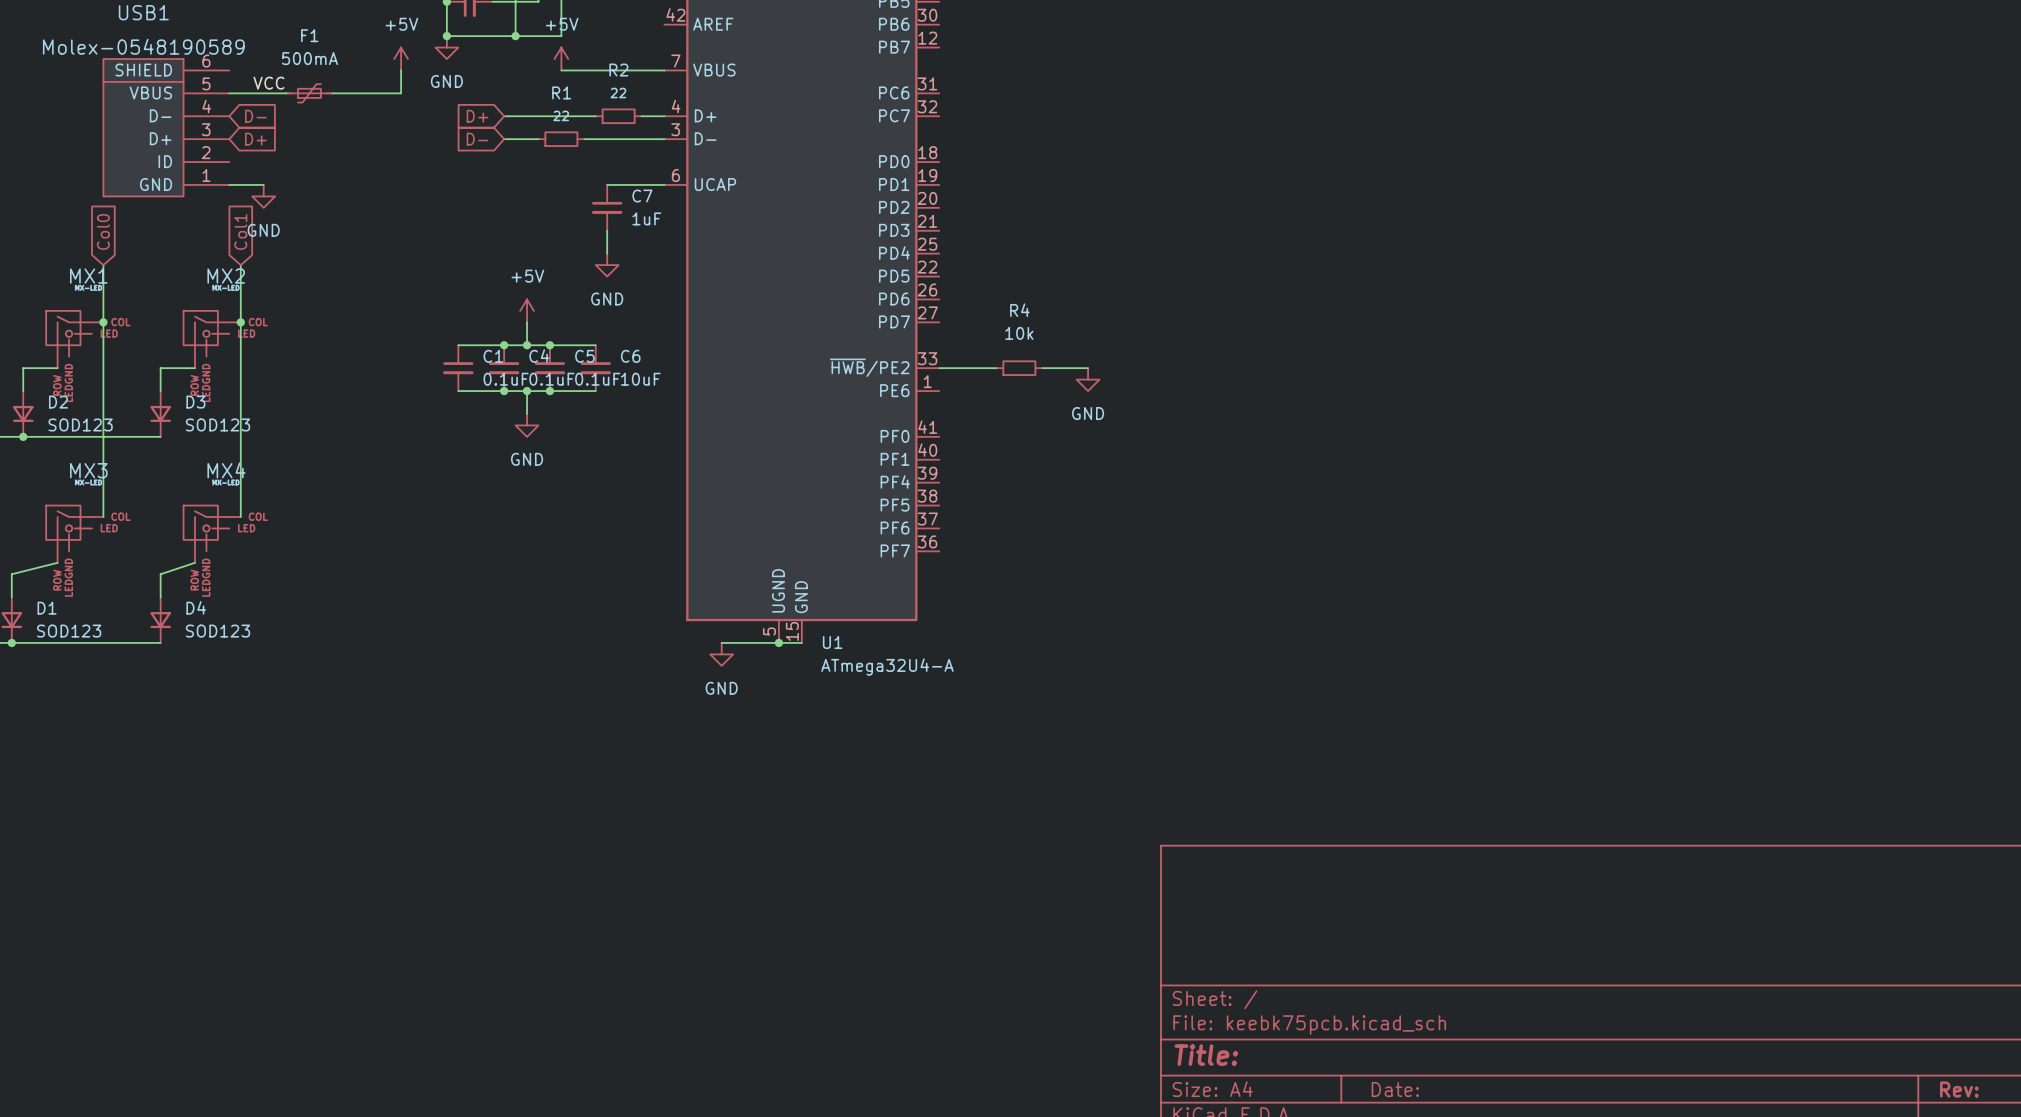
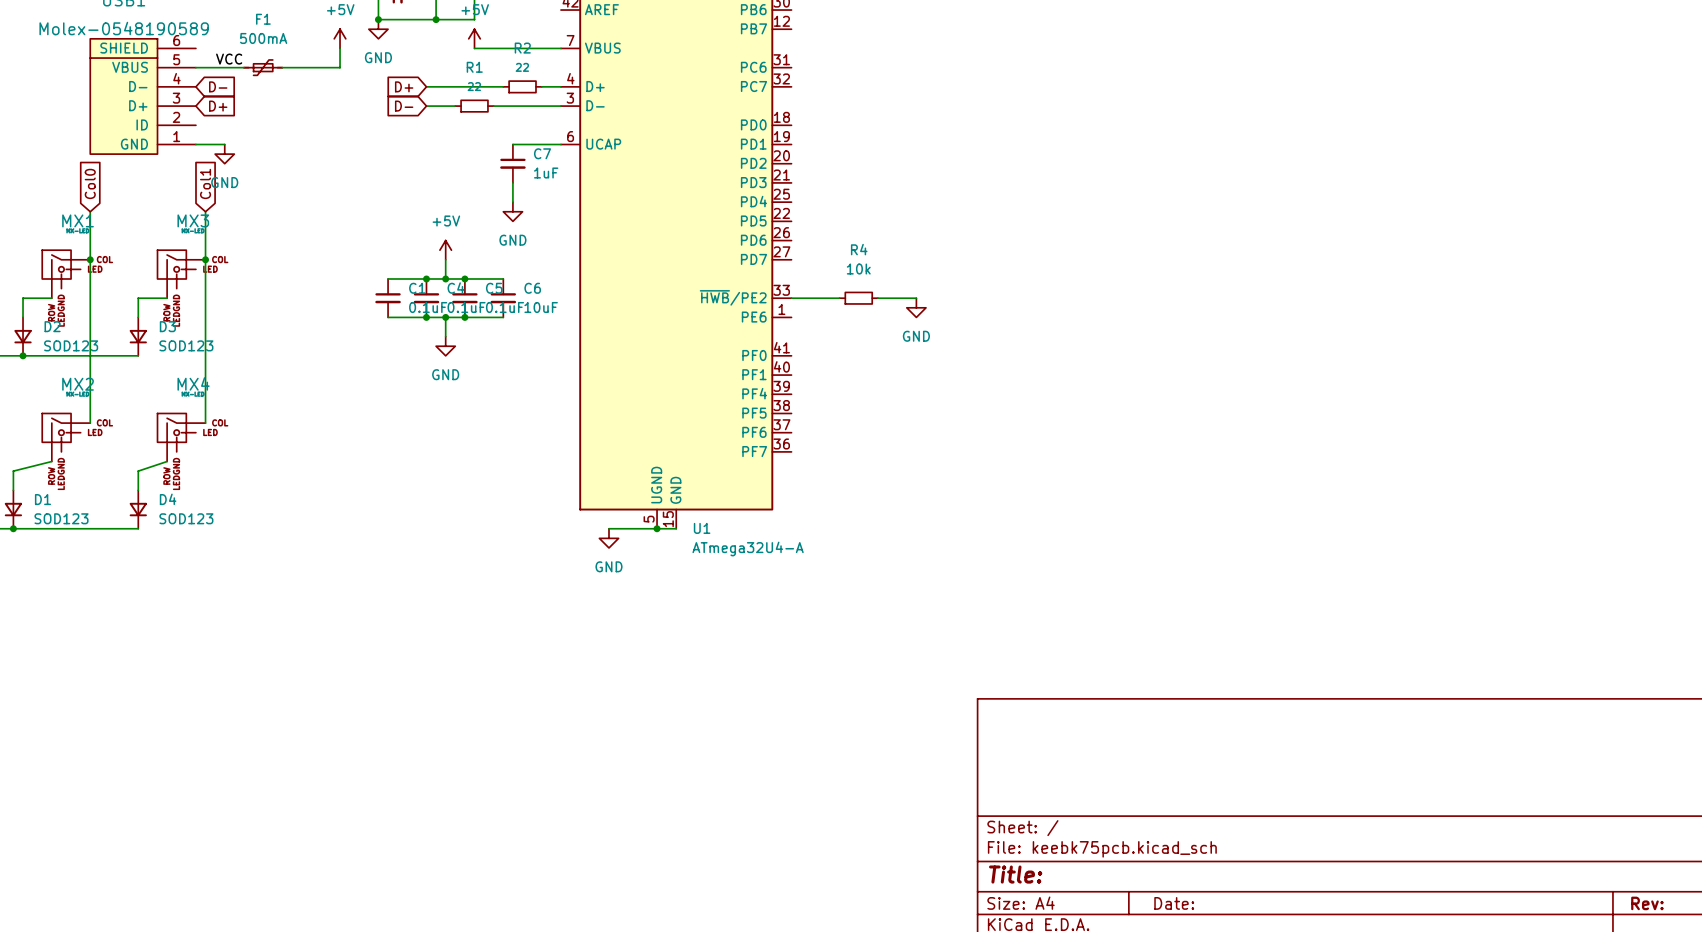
MX2 name: MX2 (226, 276) -> MX3 (193, 220)
MX3 name: MX3 (88, 470) -> MX2 (78, 384)

